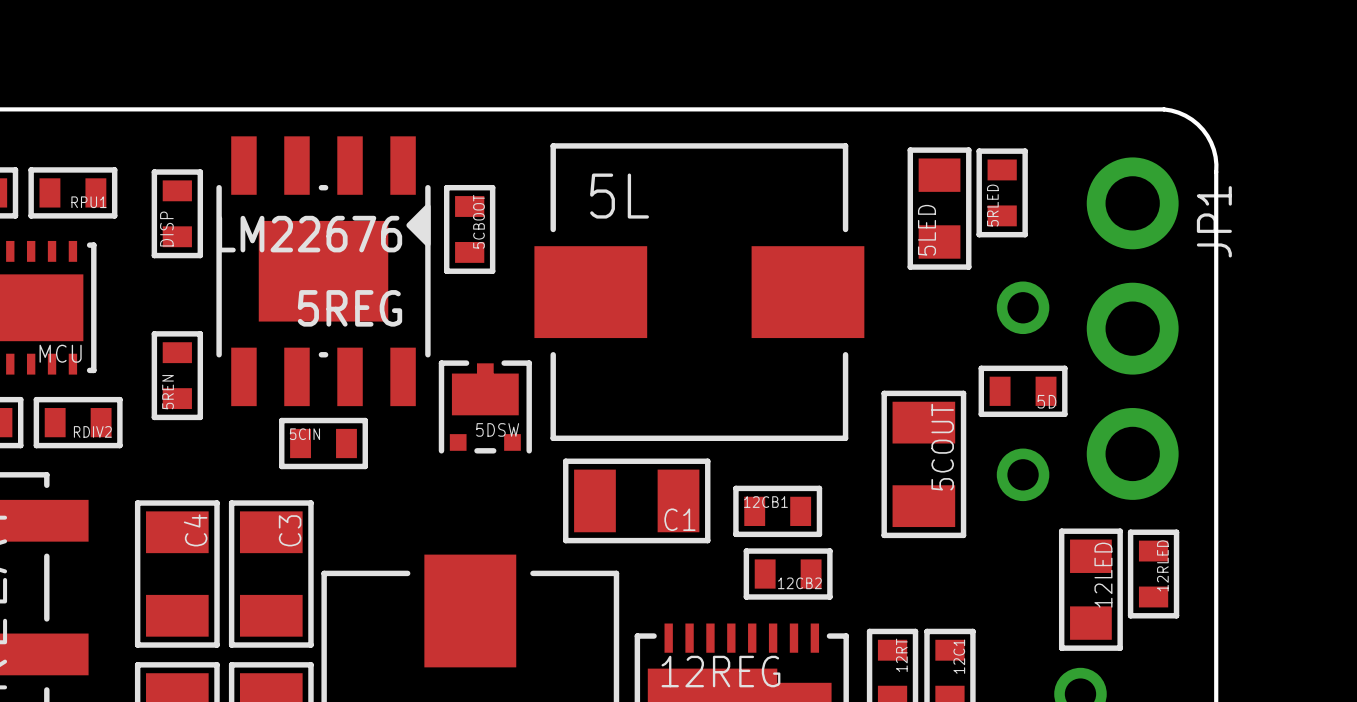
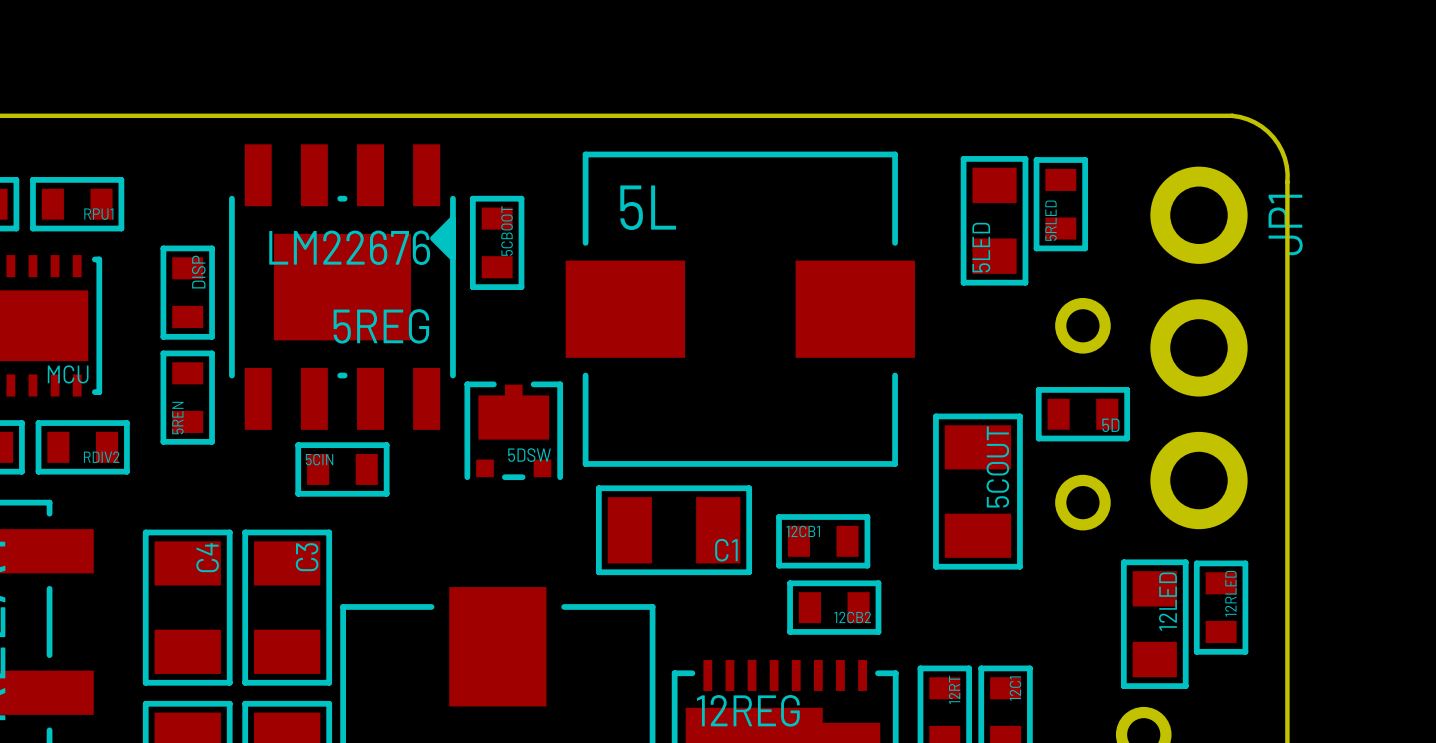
DISP position: (177, 213) -> (187, 292)
DISP name position: DISP (166, 229) -> DISP (198, 272)

